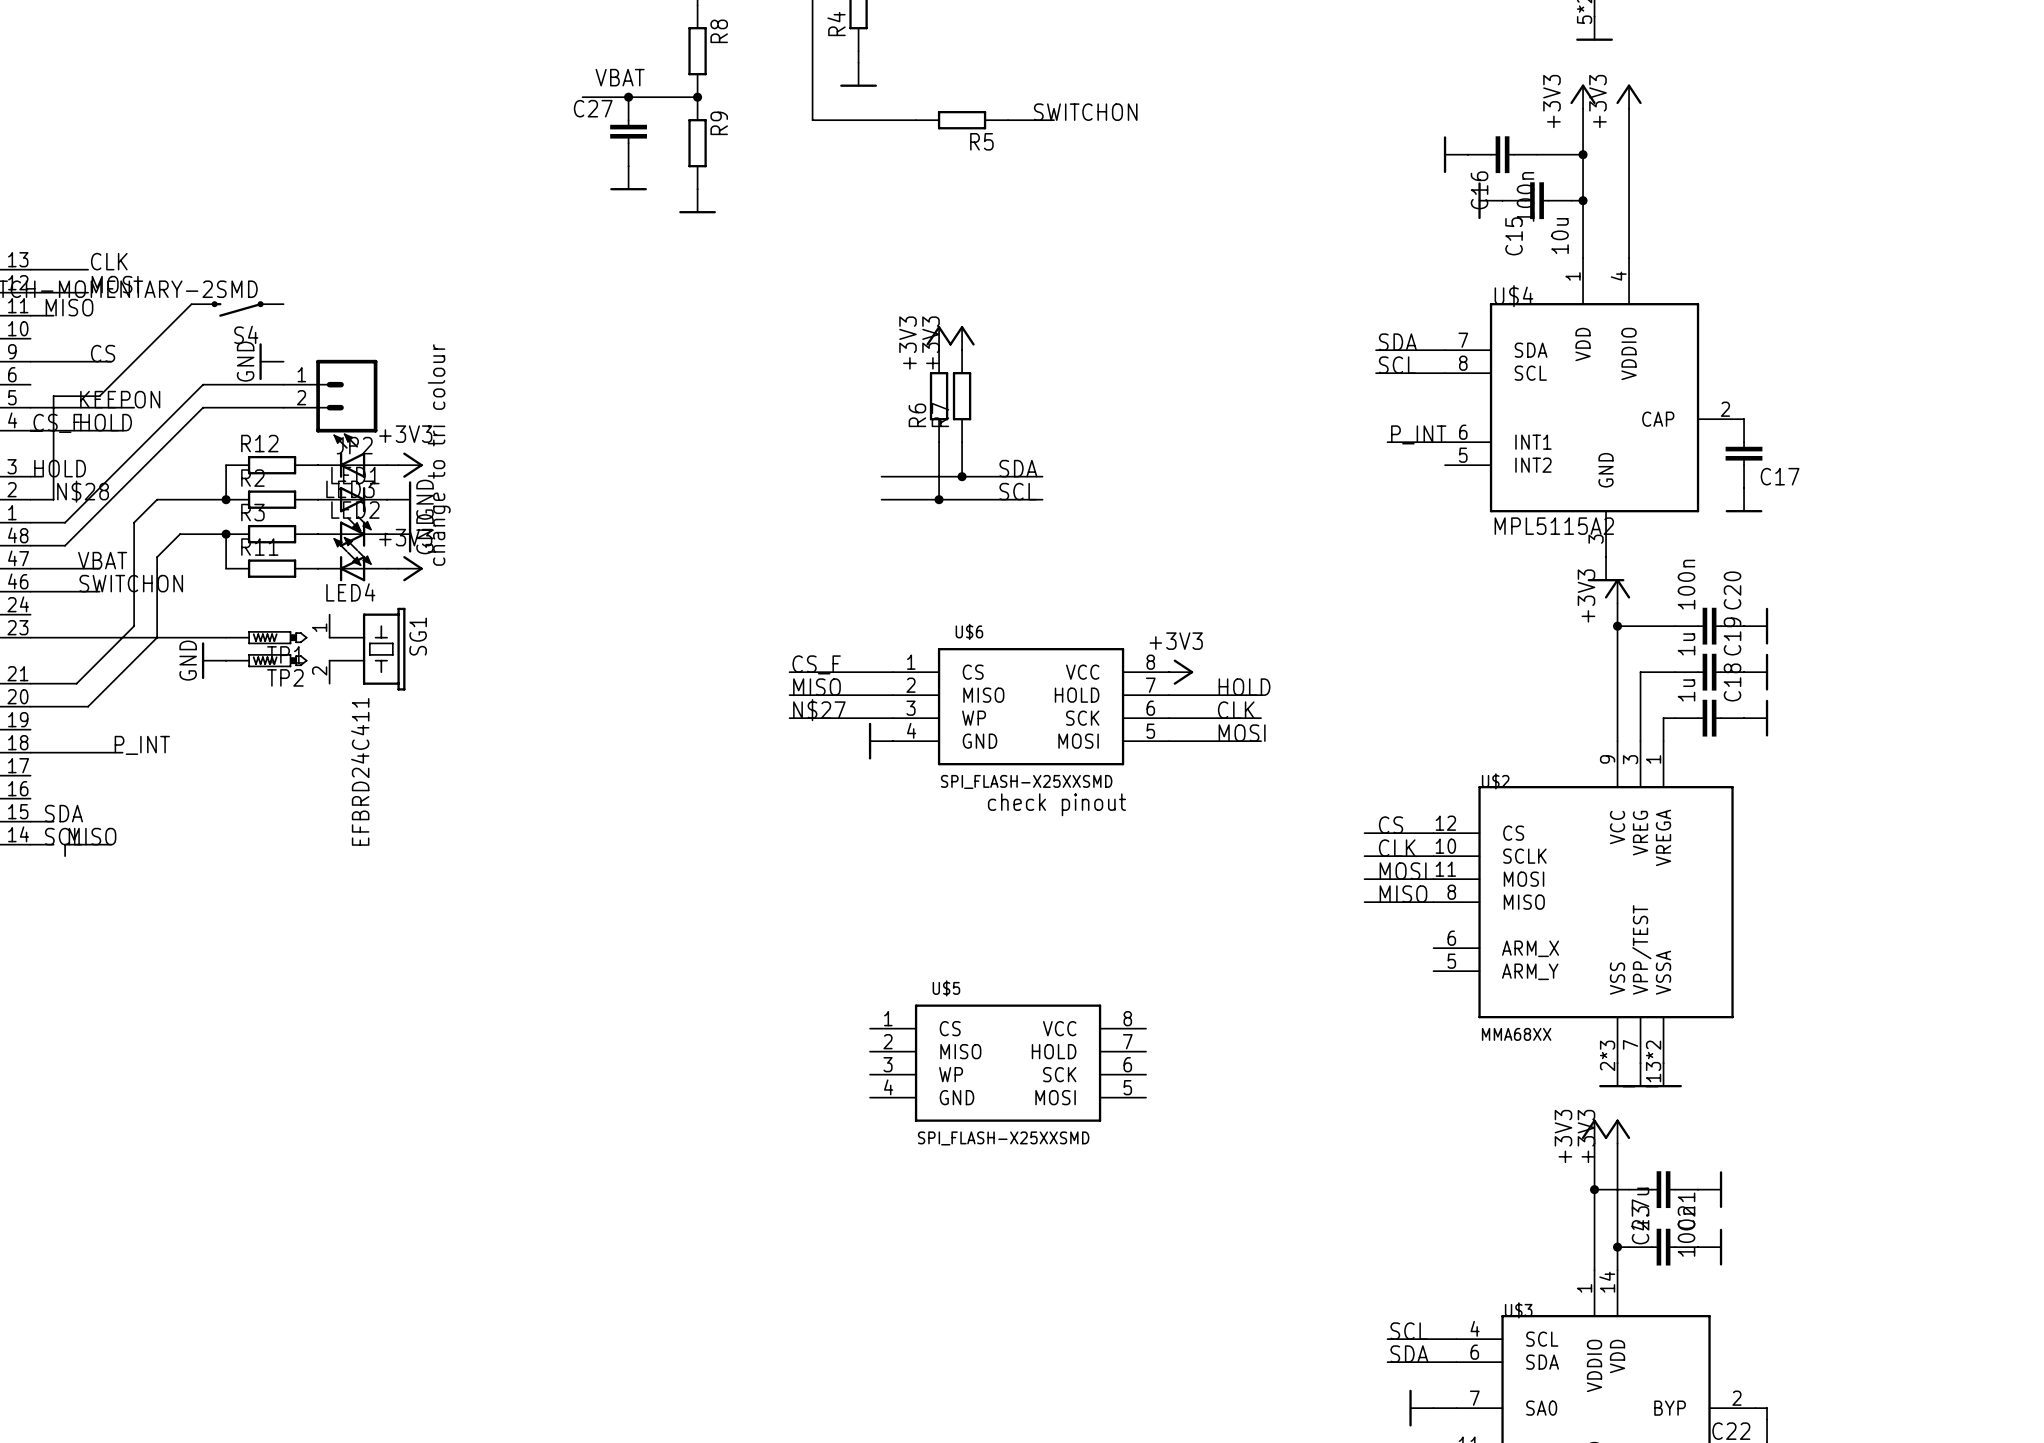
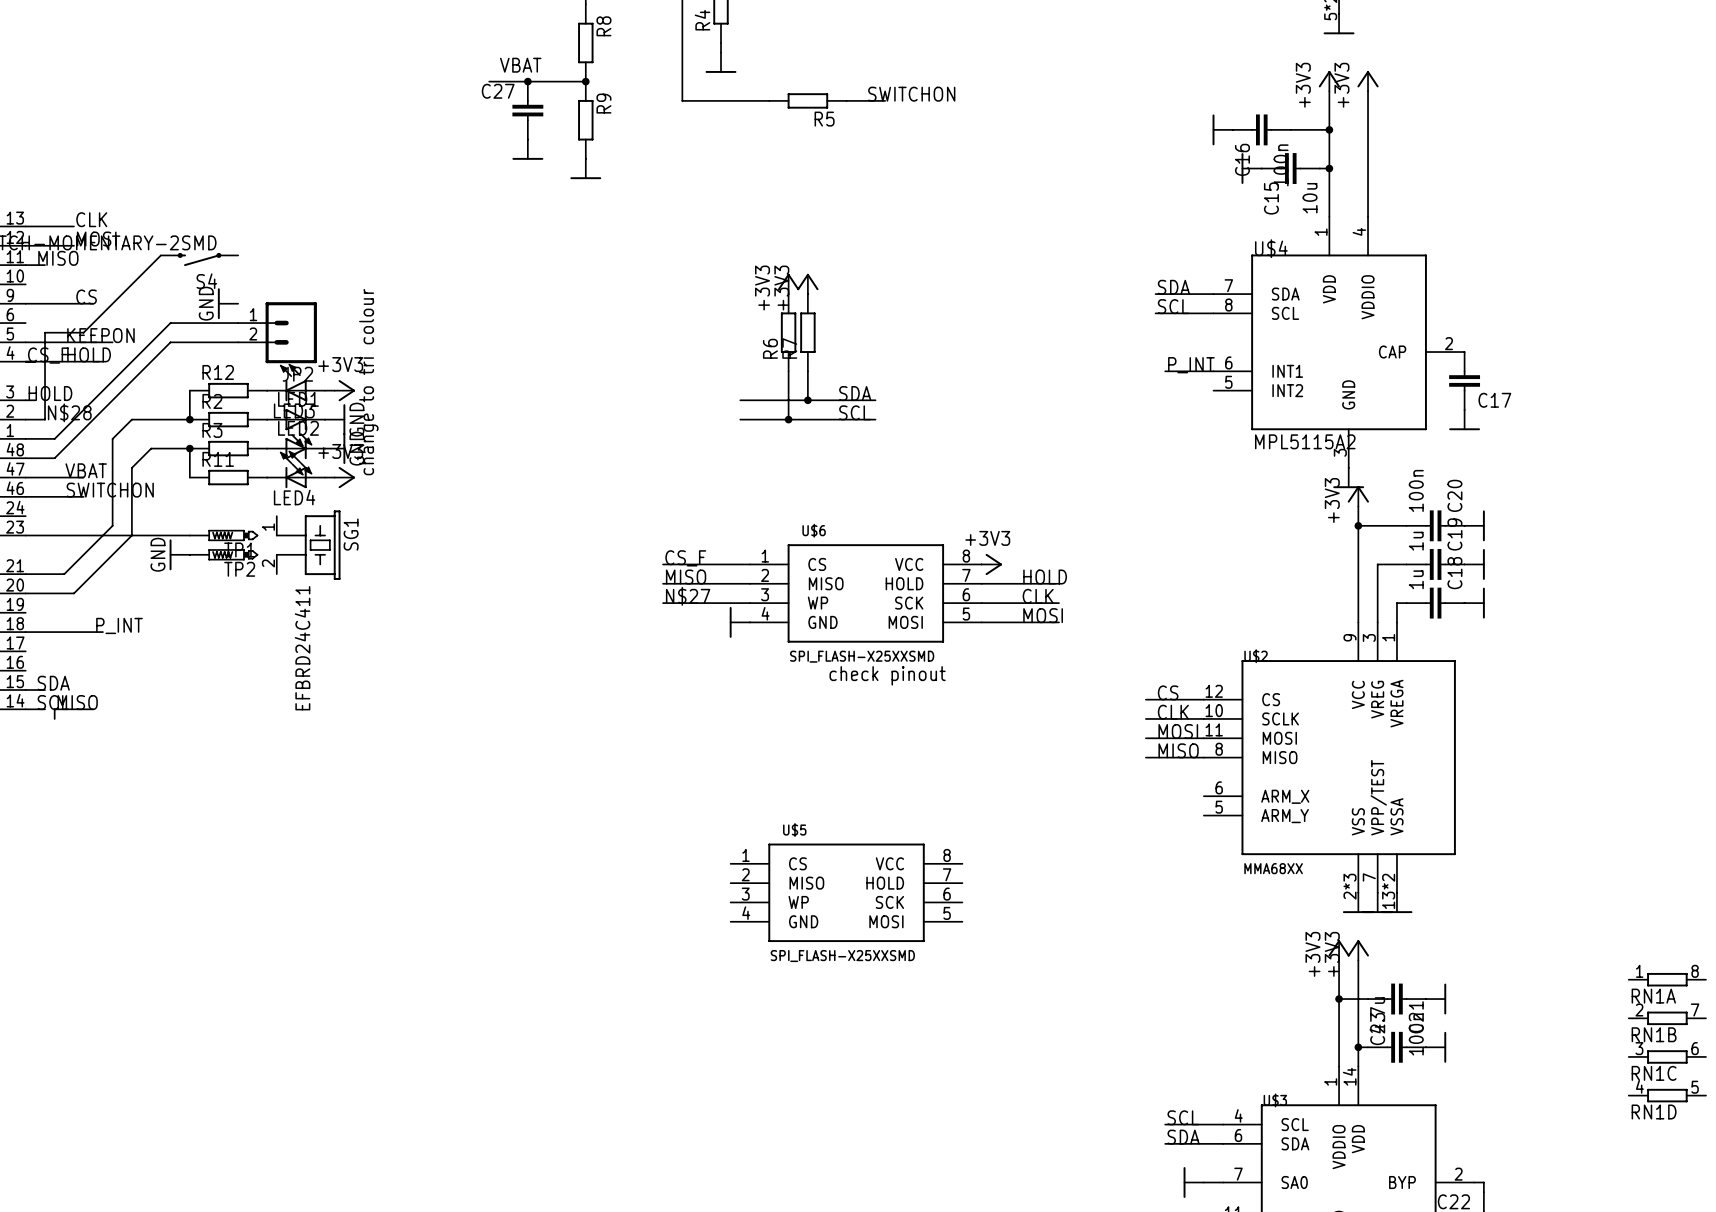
RN1A: none -> (1667, 979)
RN1B: none -> (1667, 1018)
RN1C: none -> (1667, 1056)
RN1D: none -> (1667, 1095)

